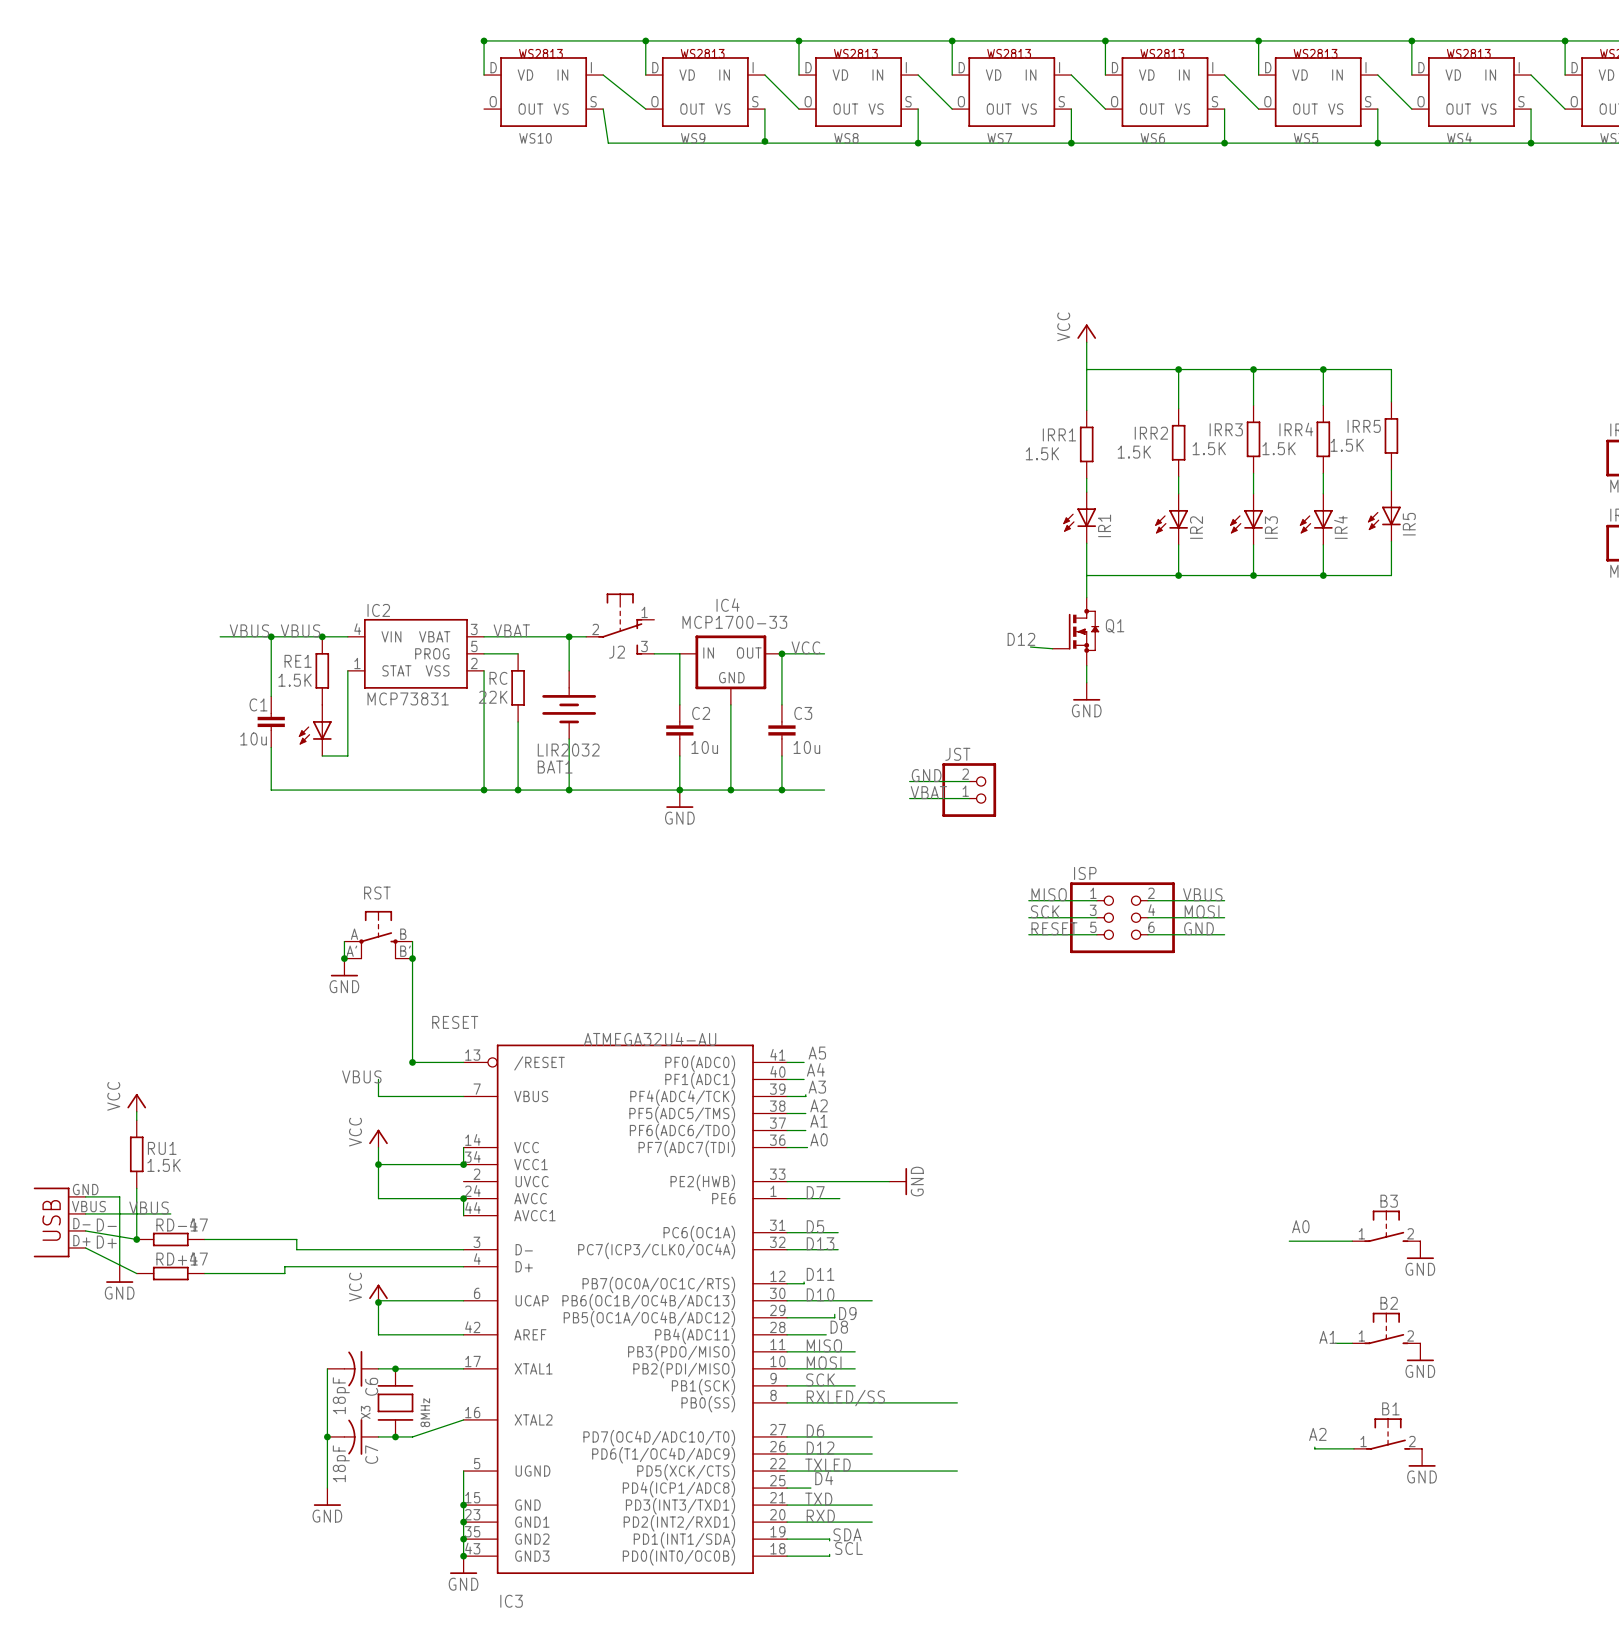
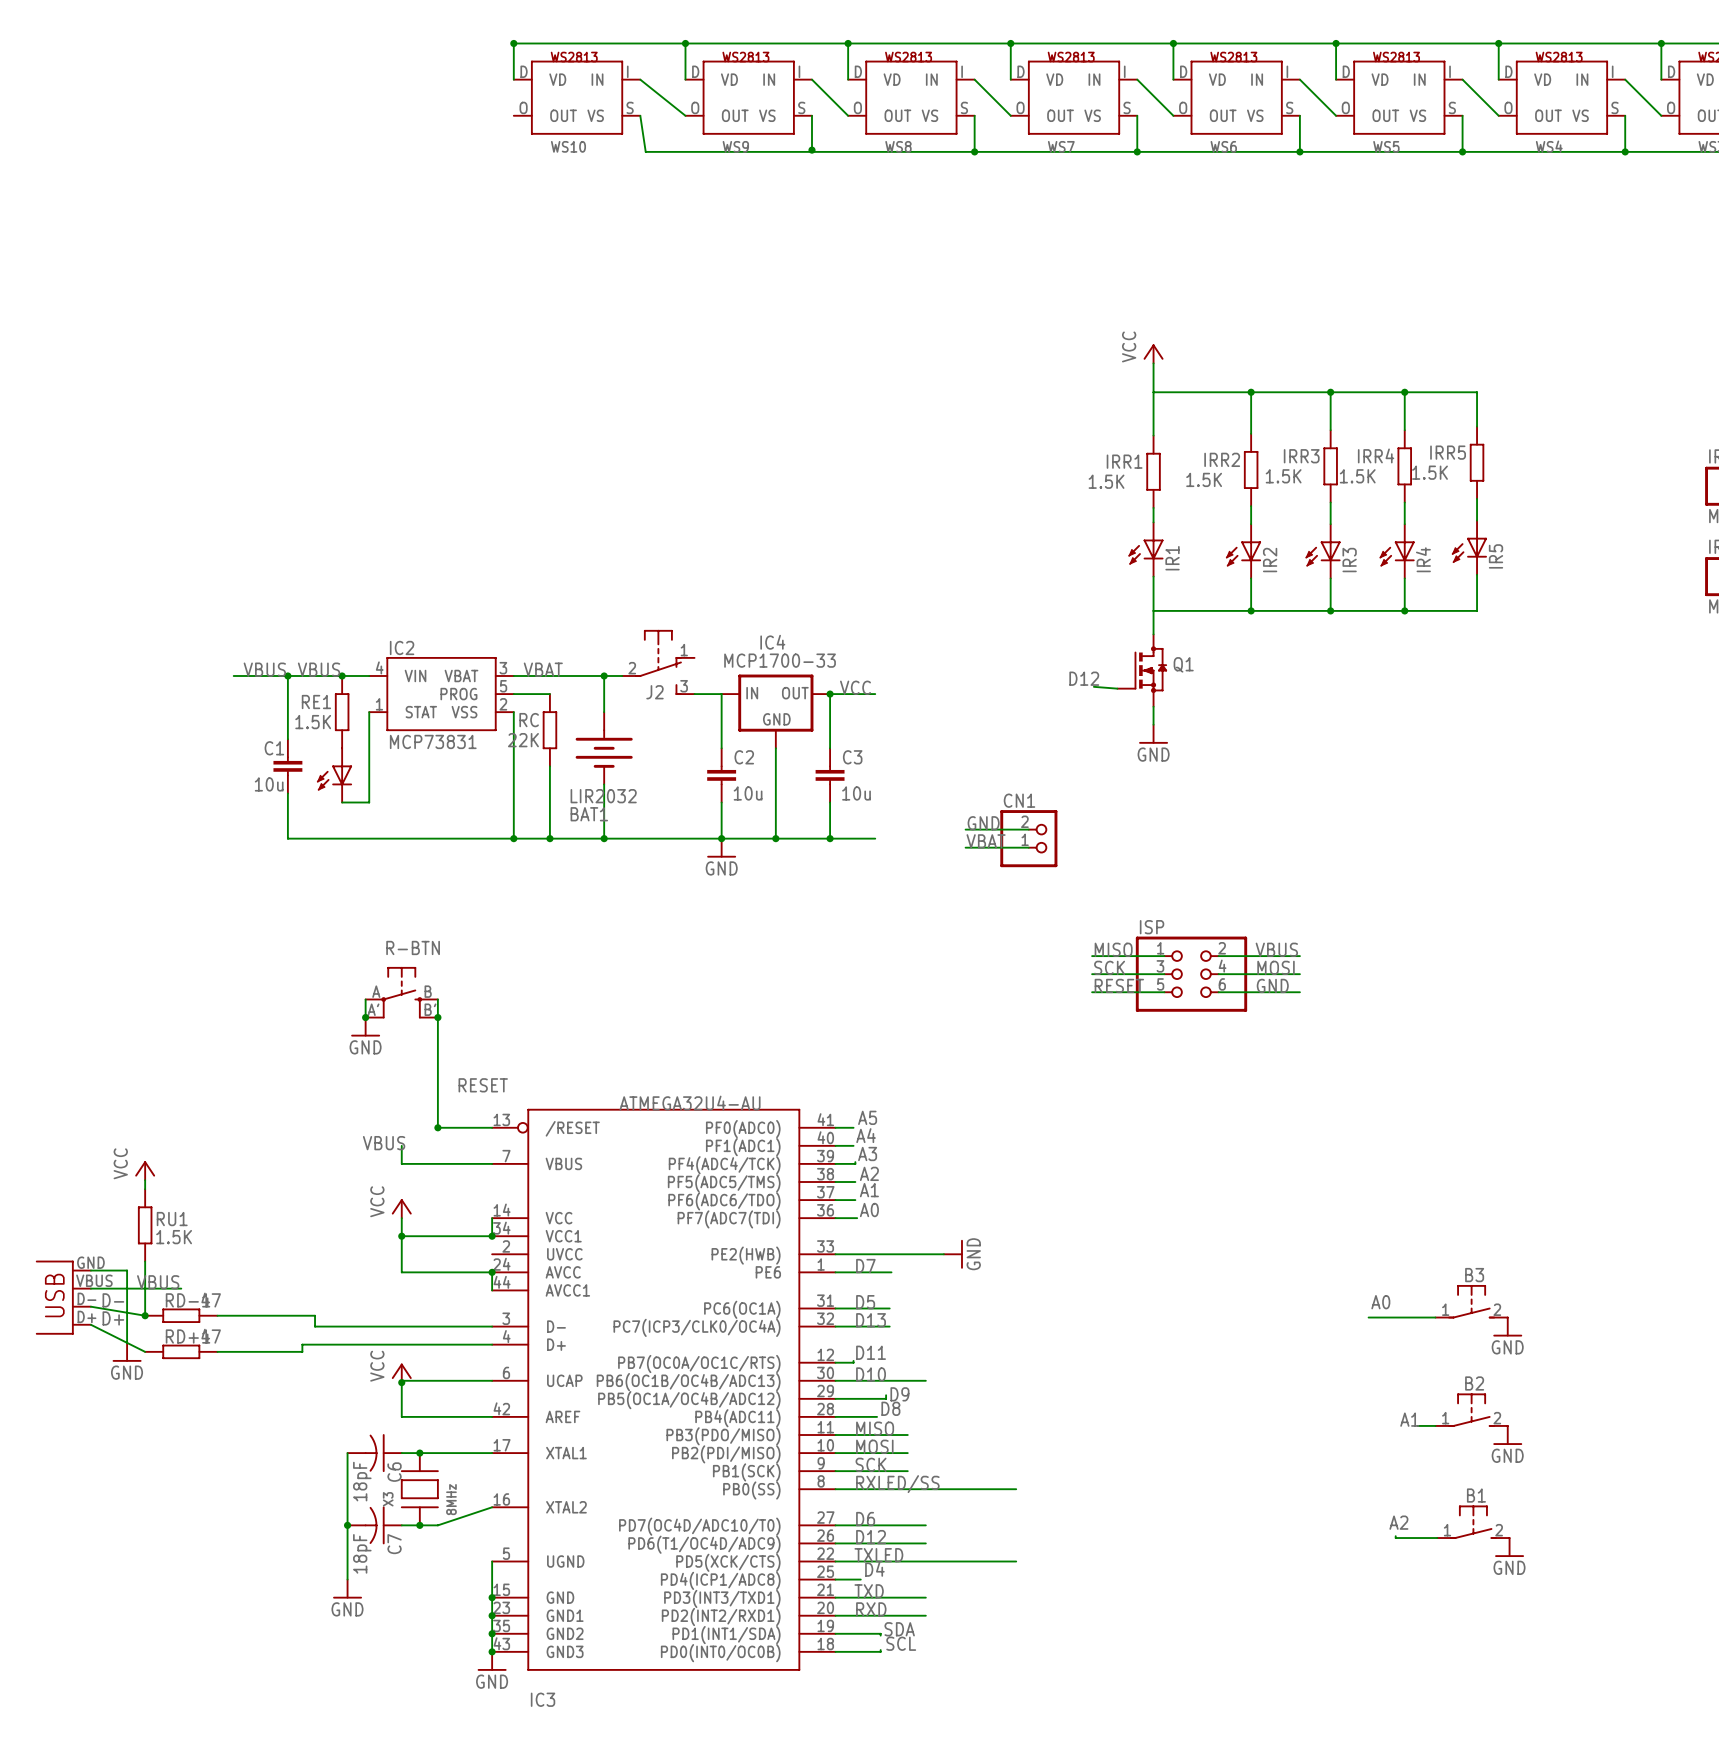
JST name: JST (957, 754) -> CN1 (1019, 800)
RST name: RST (377, 893) -> R-BTN (413, 947)

